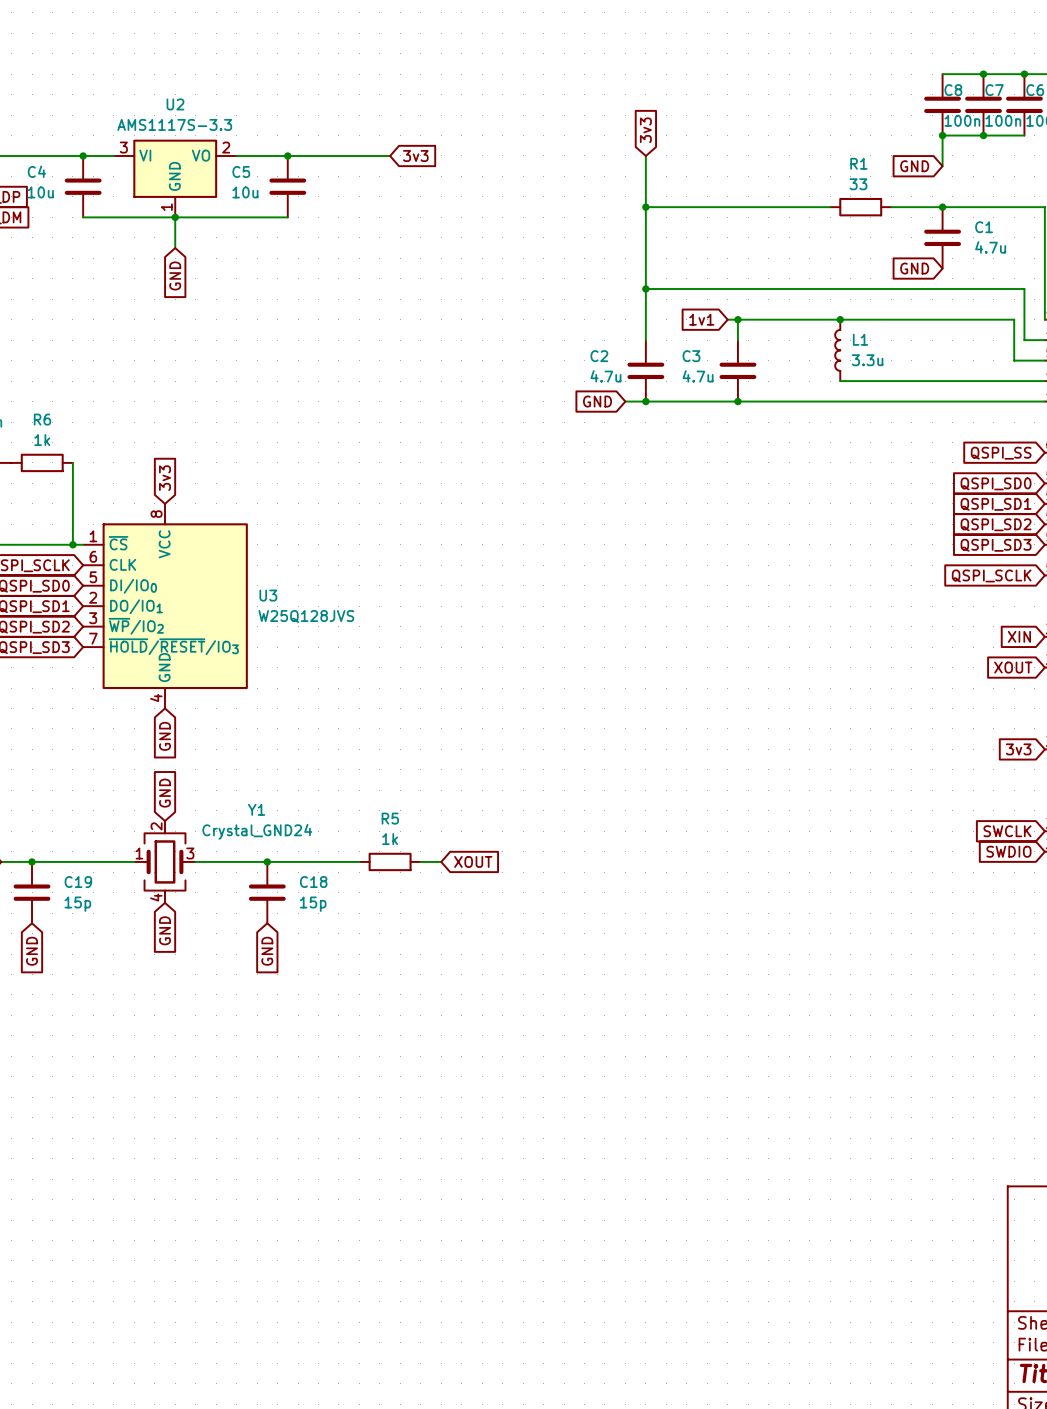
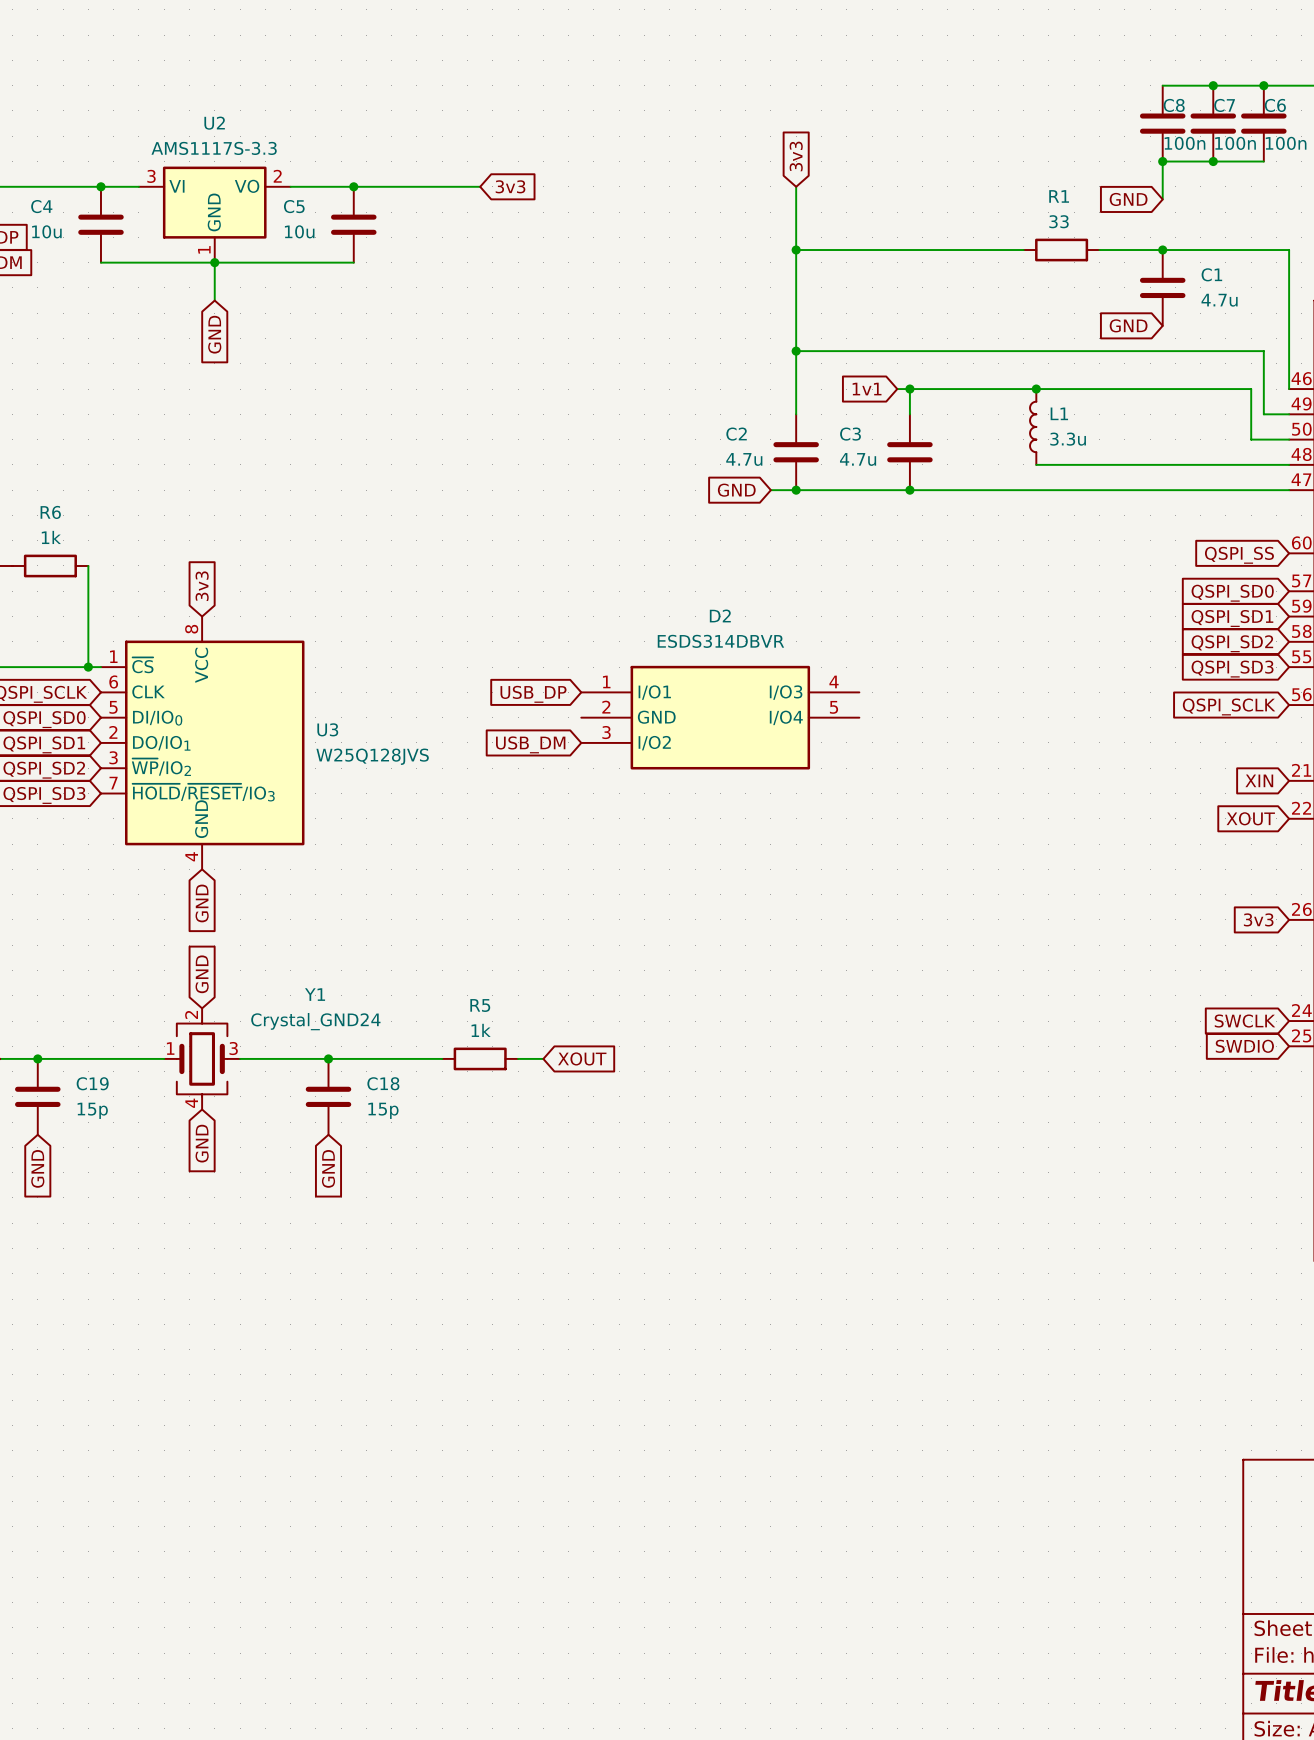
global label: none -> USB_DP (533, 694)
D2: none -> ESDS314DBVR (720, 717)
global label: none -> USB_DM (530, 744)

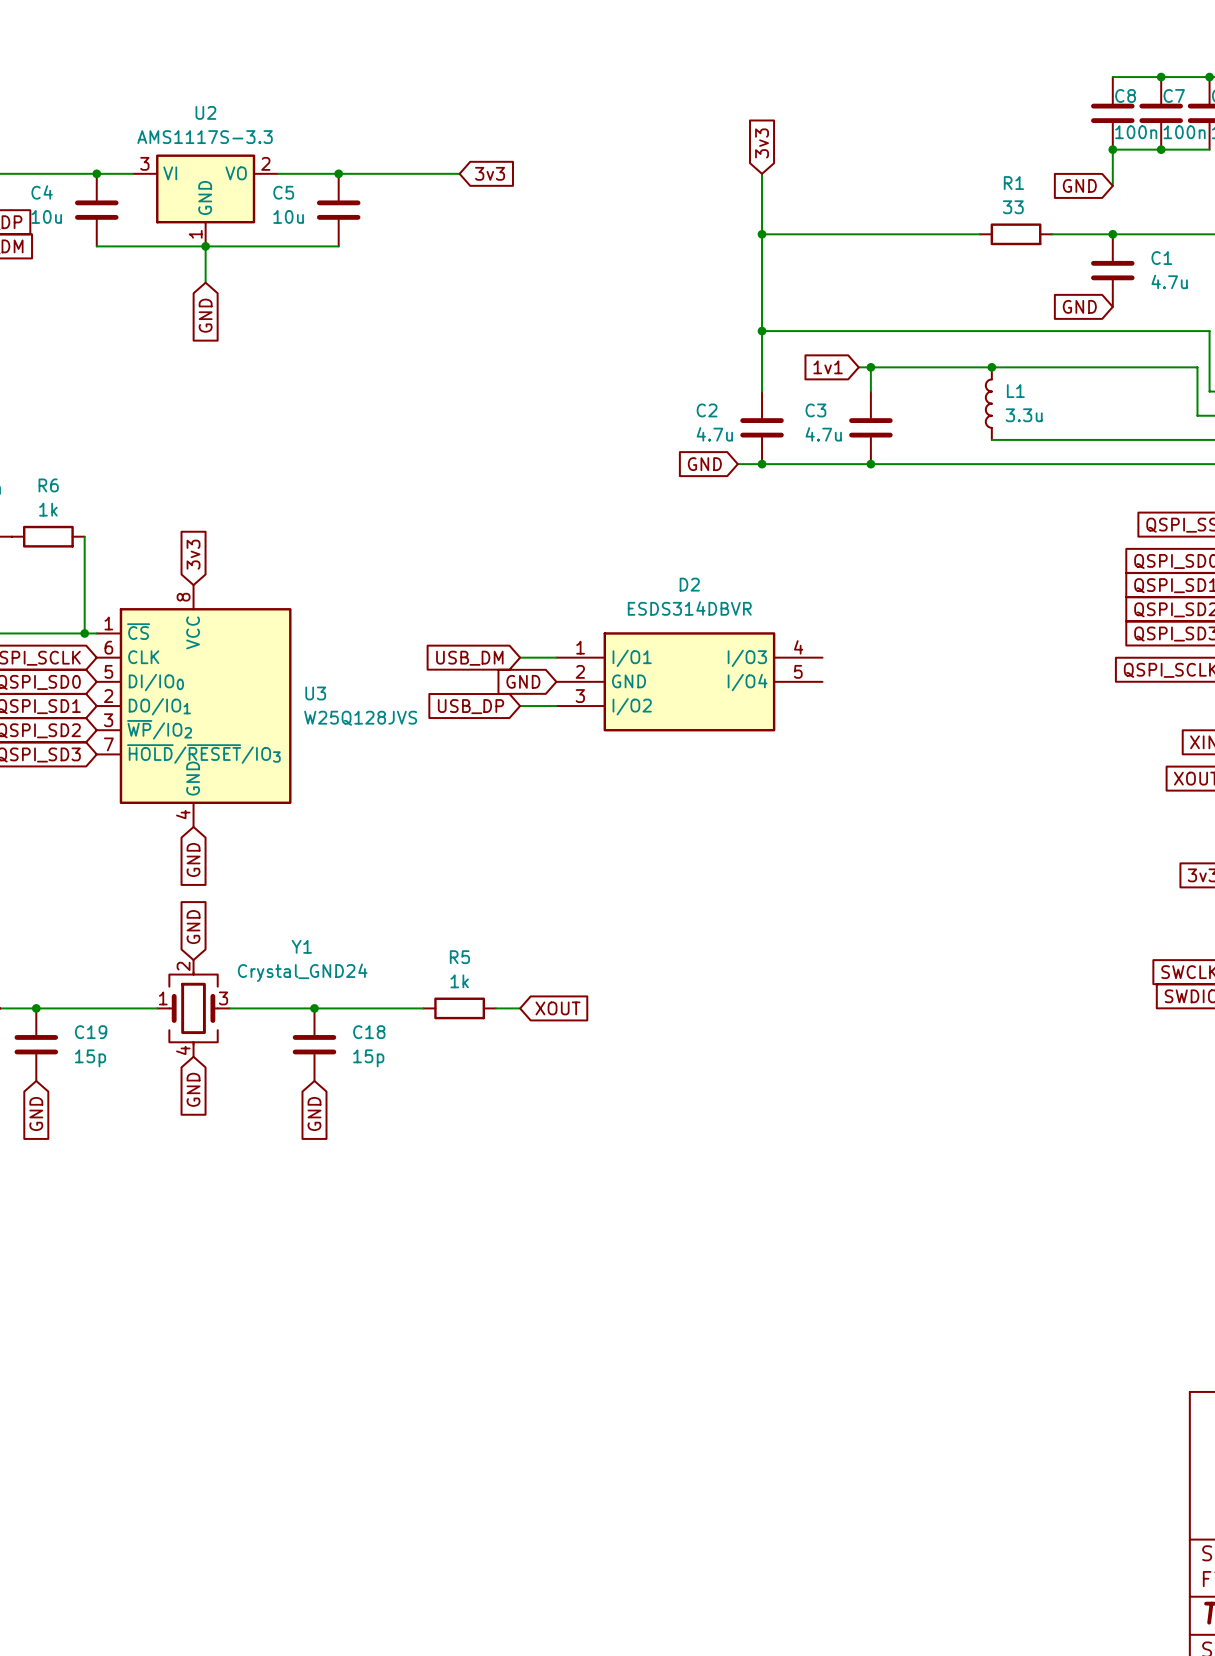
wire: none -> (520, 657) (556, 657)
global label position: USB_DP (533, 694) -> USB_DP (471, 706)
global label: none -> GND (523, 681)
wire: none -> (520, 706) (556, 706)
global label position: USB_DM (530, 744) -> USB_DM (469, 658)

